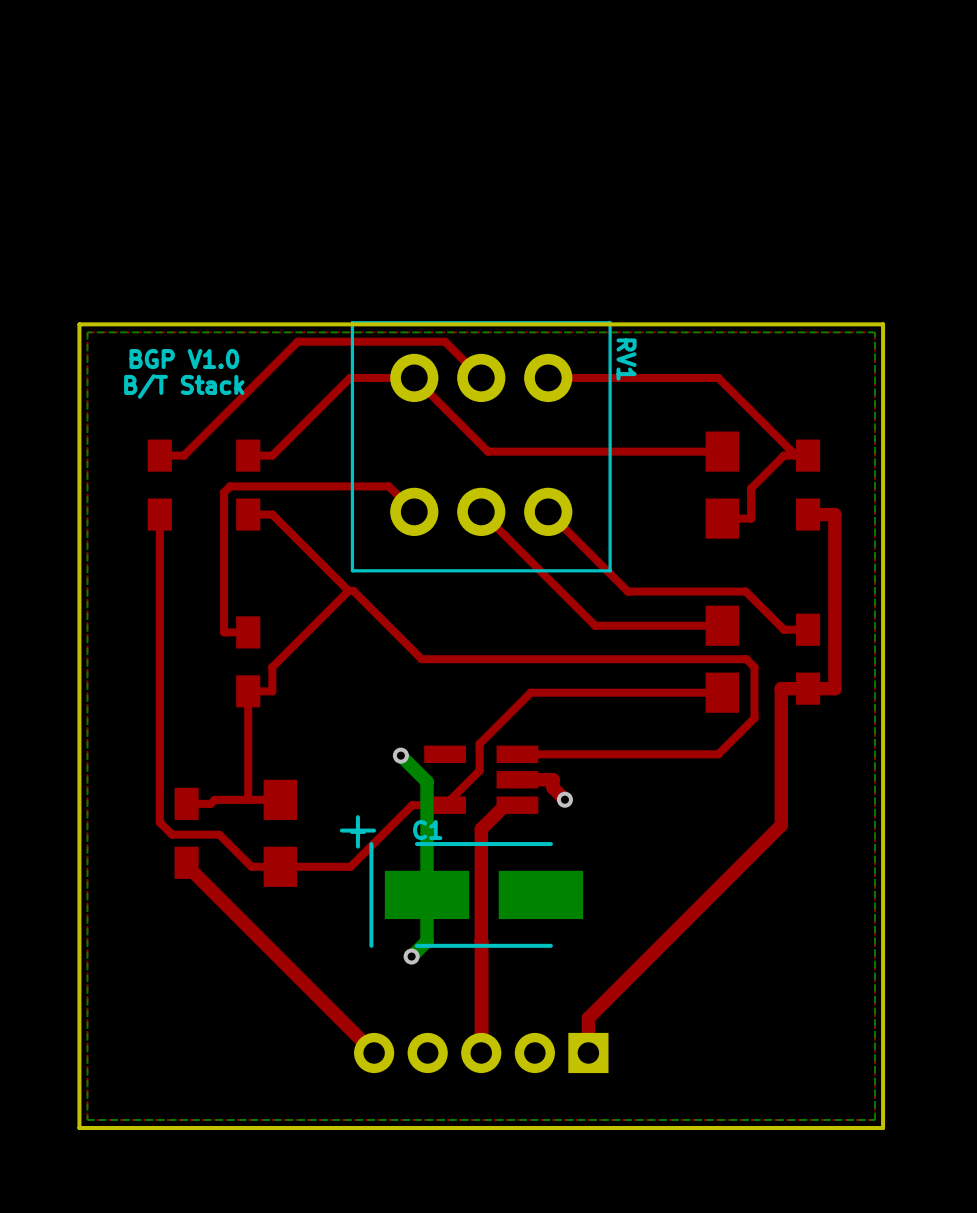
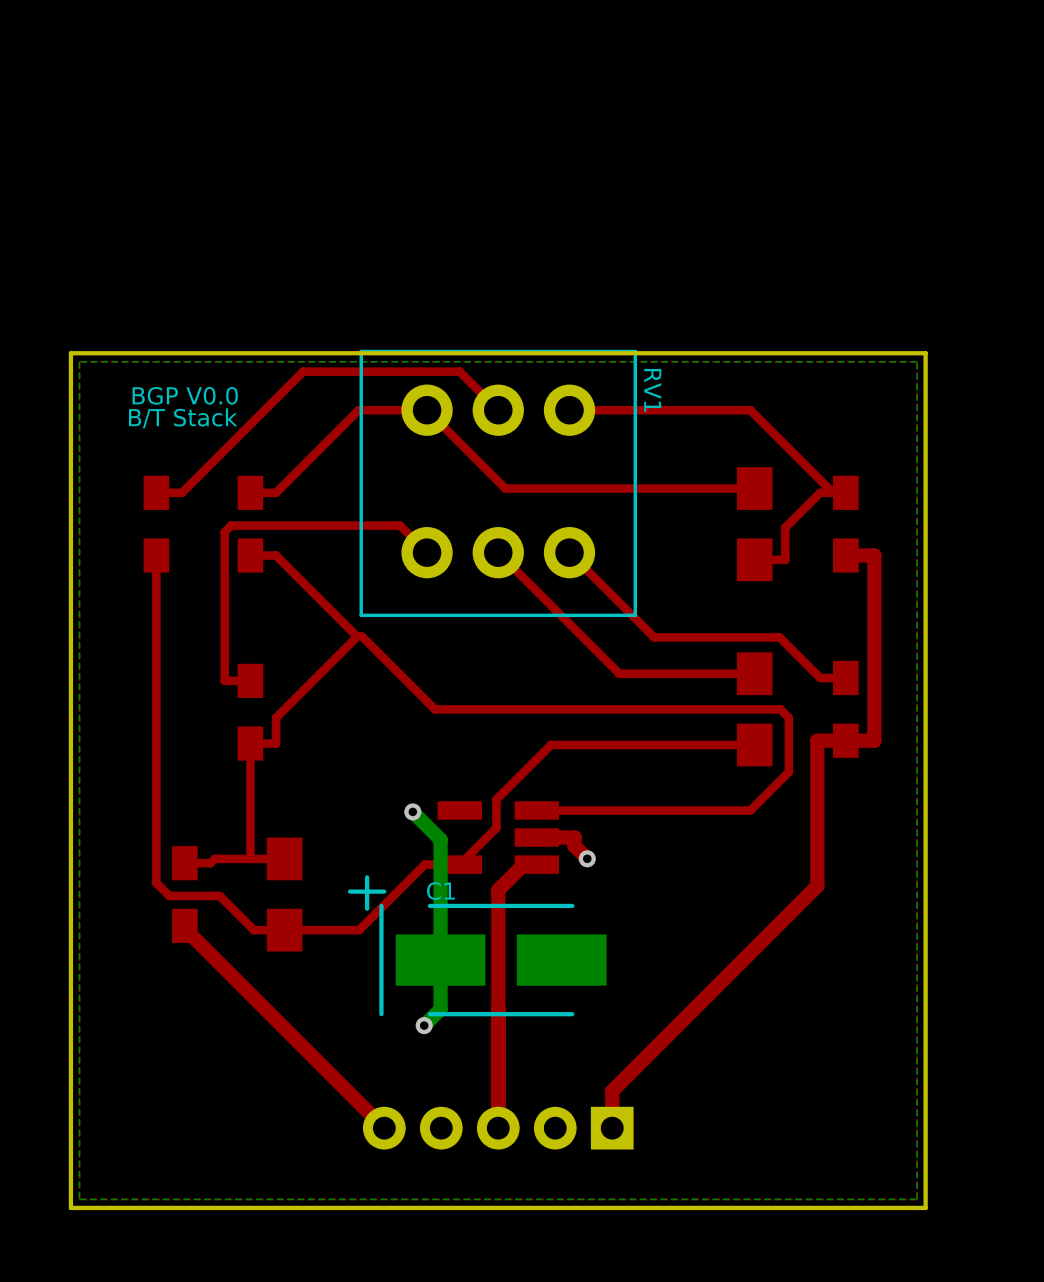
text: BGP V1.0 (184, 359) -> BGP V0.0 (185, 395)

